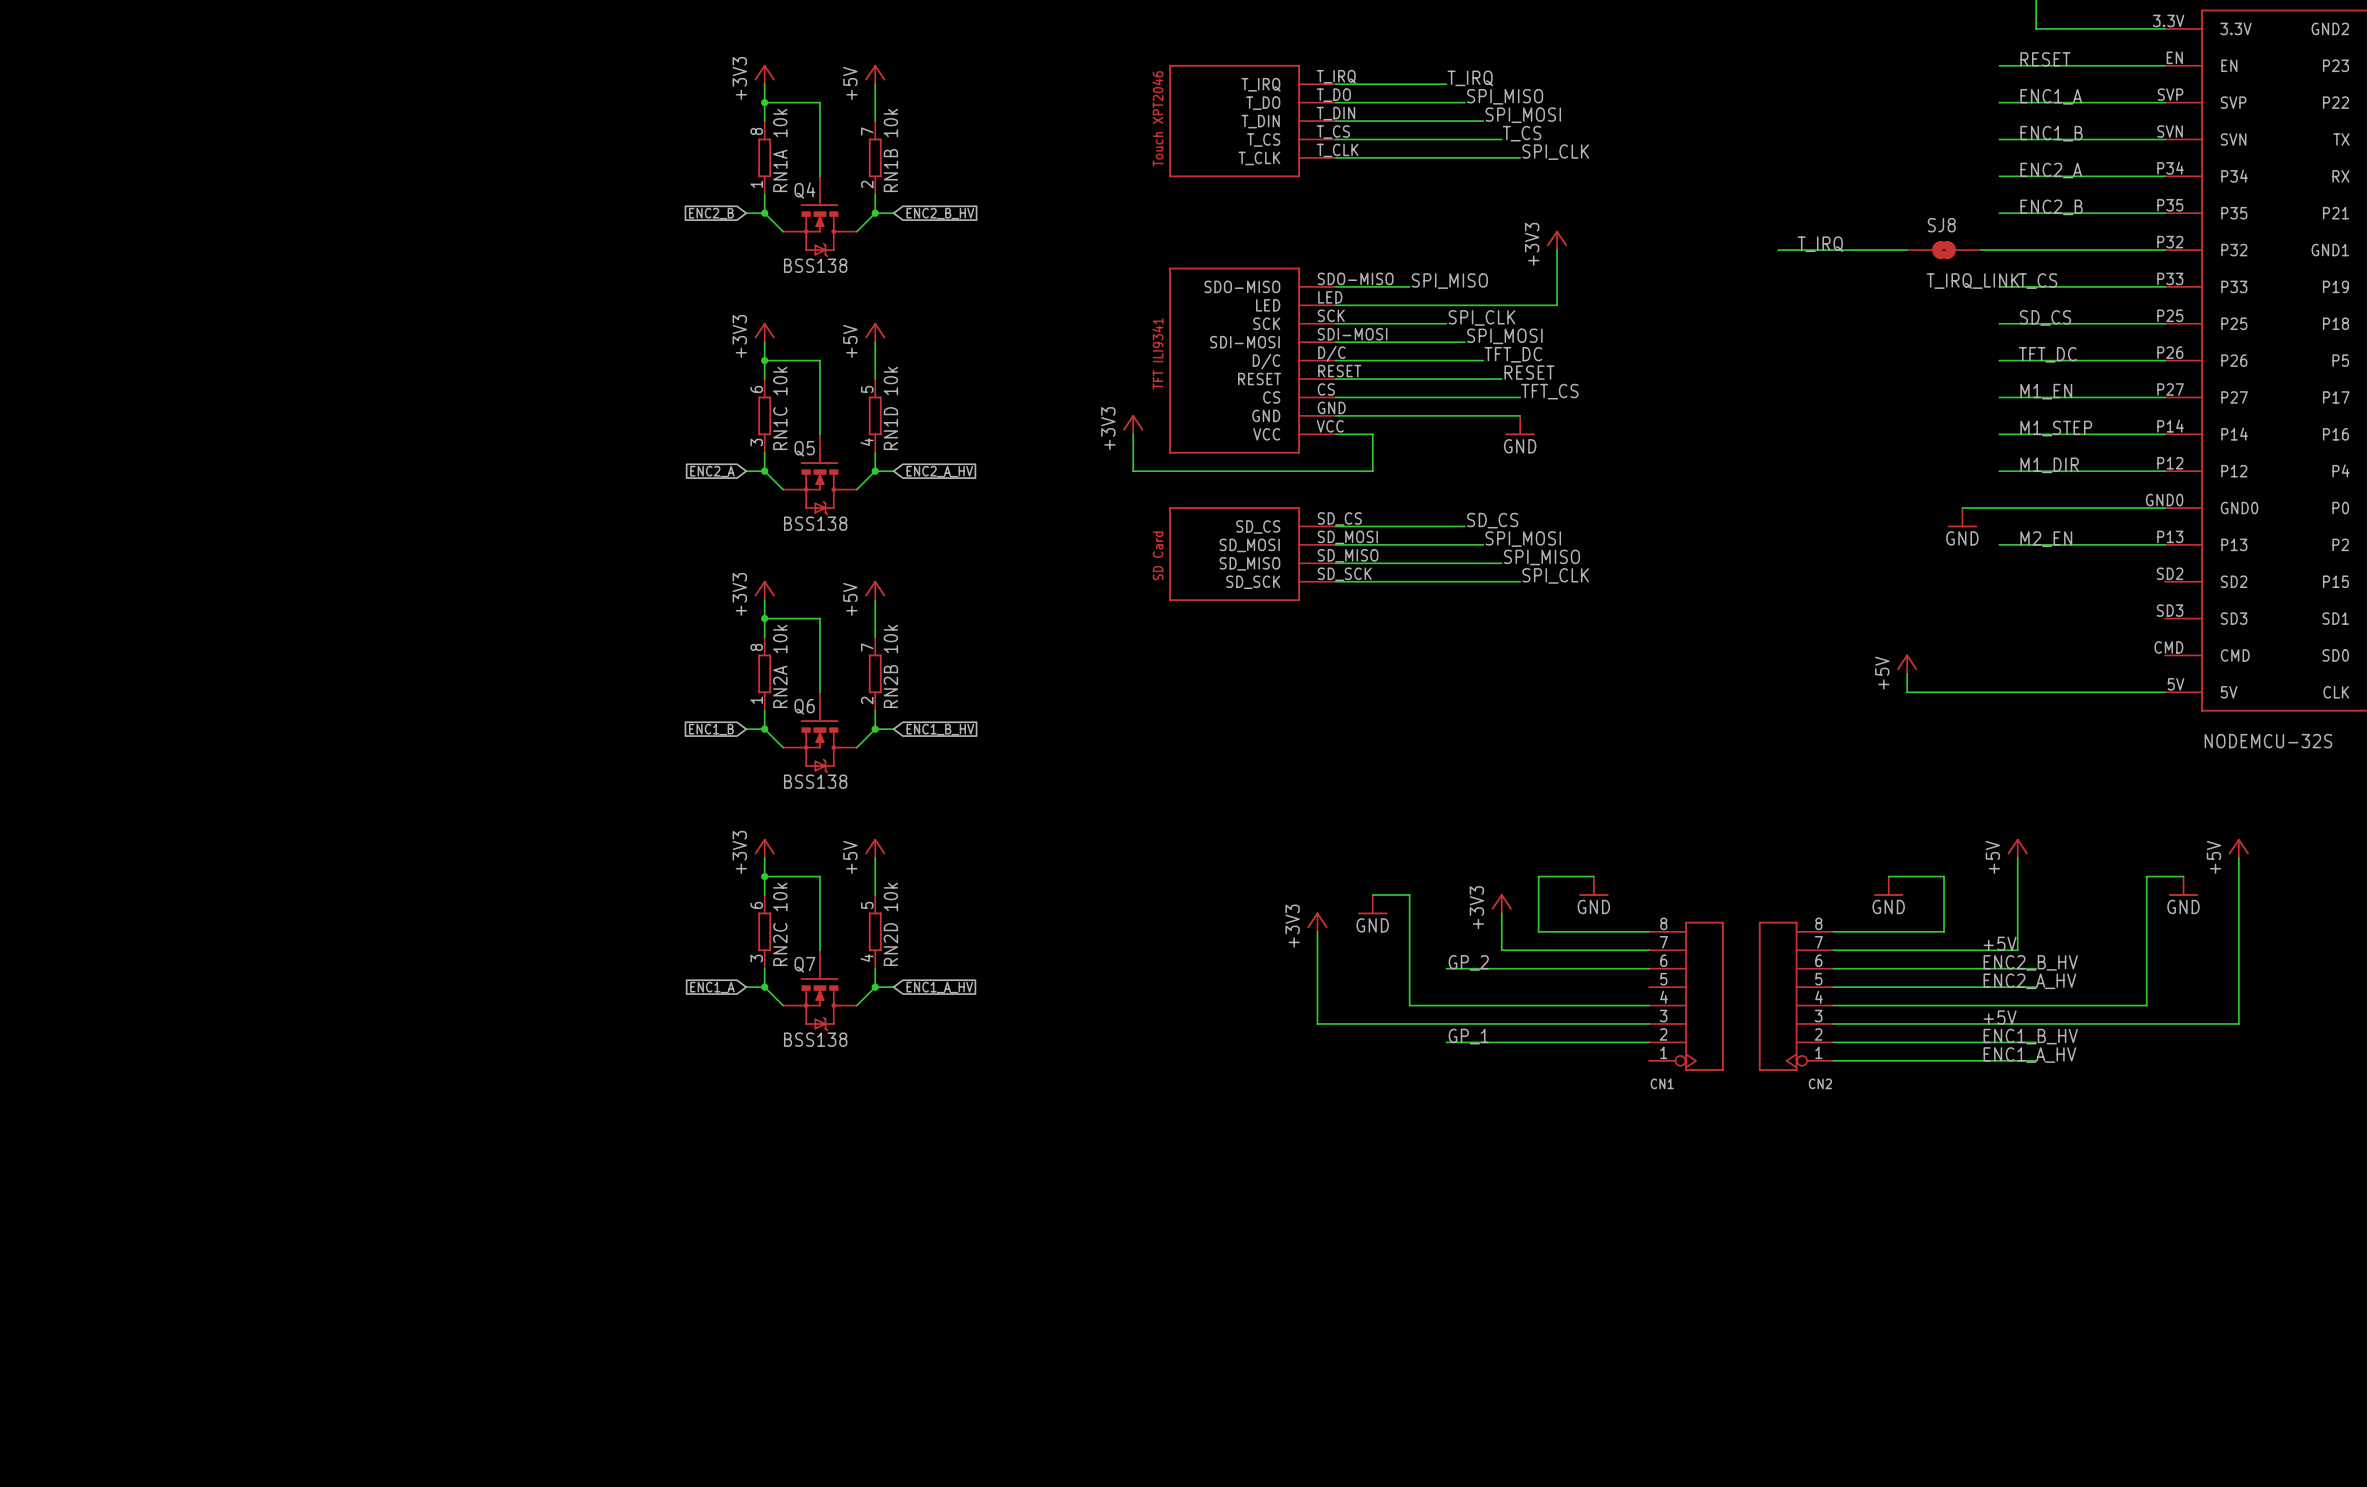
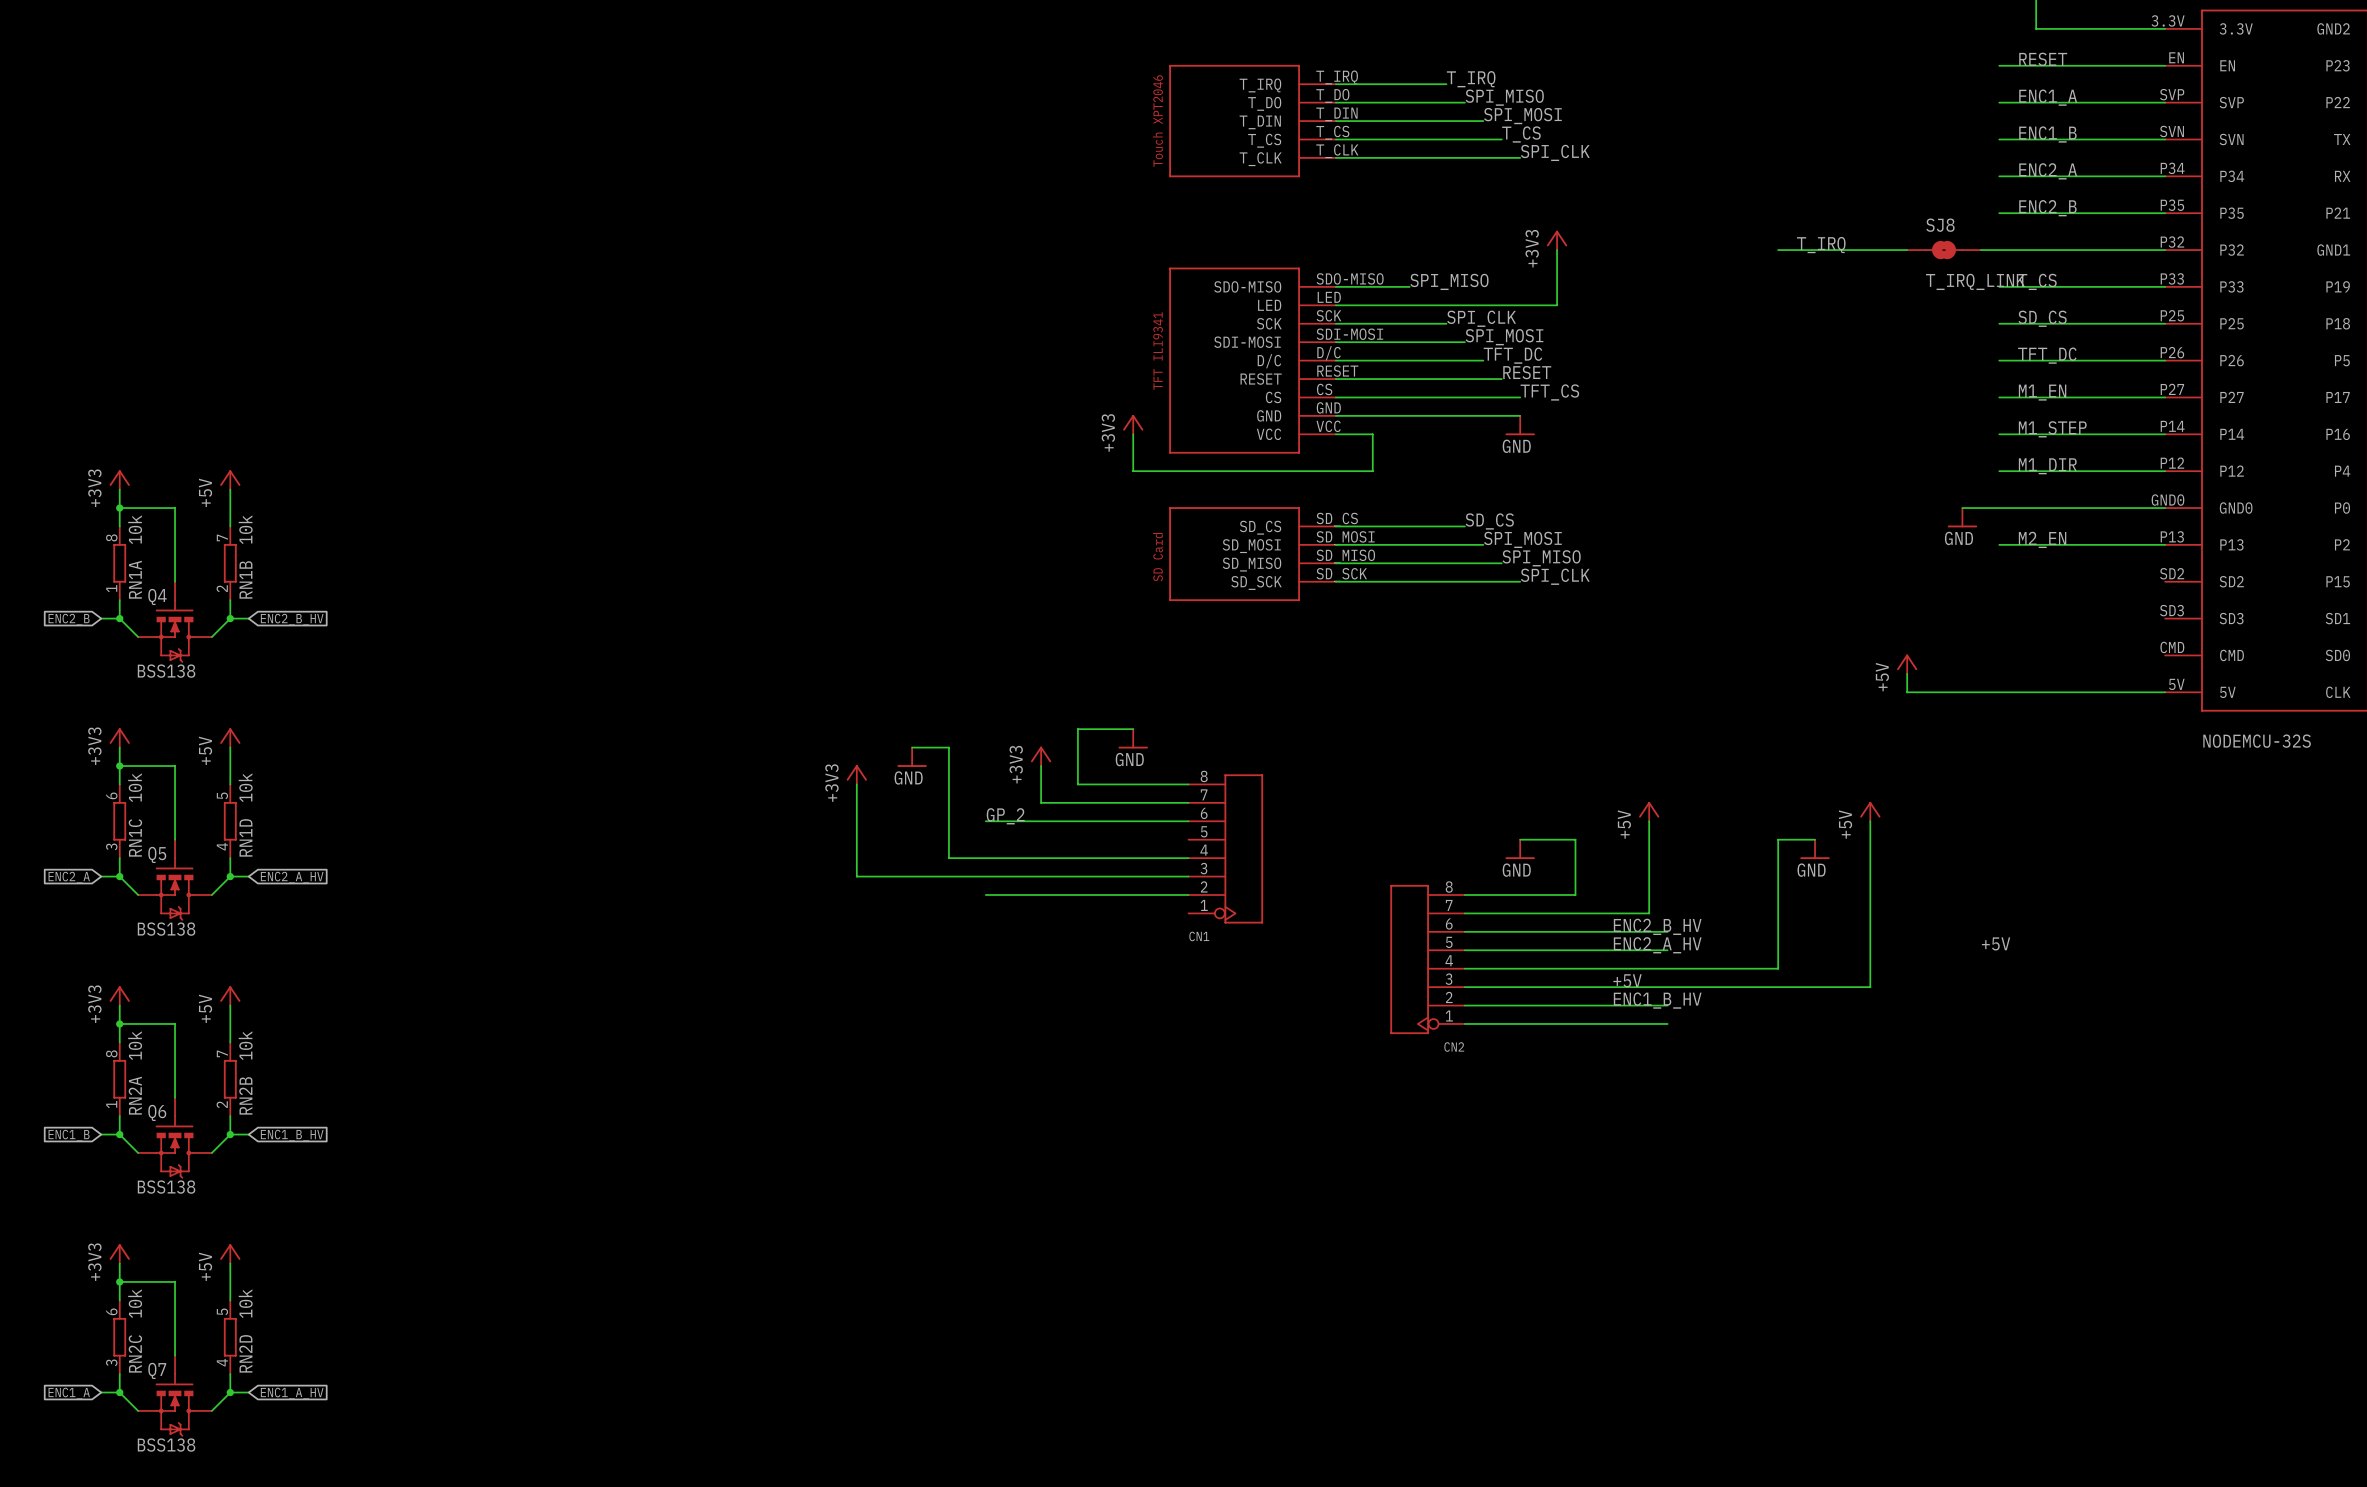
power symbol: +3V3 (764, 74) -> none
power symbol: +5V (875, 74) -> none
wire: (764, 84) (764, 121) -> none
wire: (875, 84) (875, 121) -> none
wire: (764, 102) (819, 102) (819, 176) -> none
junction: (764, 102) -> none
RN1A position: (764, 157) -> (119, 563)
RN1B position: (875, 157) -> (230, 563)
wire: (764, 194) (764, 213) -> none
wire: (875, 194) (875, 213) -> none
global label: ENC2_B (711, 213) -> none
wire: (746, 213) (764, 213) -> none
wire: (764, 213) (783, 231) -> none
junction: (764, 213) -> none
wire: (875, 213) (893, 213) -> none
wire: (875, 213) (856, 231) -> none
junction: (875, 213) -> none
global label: ENC2_B_HV (940, 213) -> none
Q4 position: (819, 216) -> (175, 622)
power symbol: +3V3 (764, 332) -> none
power symbol: +5V (875, 332) -> none
wire: (764, 342) (764, 379) -> none
wire: (875, 342) (875, 379) -> none
wire: (764, 360) (819, 360) (819, 434) -> none
junction: (764, 360) -> none
RN1C position: (764, 415) -> (119, 821)
RN1D position: (875, 415) -> (230, 821)
wire: (764, 452) (764, 471) -> none
wire: (875, 452) (875, 471) -> none
global label: ENC2_A (712, 471) -> none
wire: (746, 471) (764, 471) -> none
wire: (764, 471) (783, 489) -> none
junction: (764, 471) -> none
wire: (875, 471) (893, 471) -> none
wire: (875, 471) (856, 489) -> none
junction: (875, 471) -> none
global label: ENC2_A_HV (939, 471) -> none
Q5 position: (819, 474) -> (175, 880)
power symbol: none -> +3V3 (119, 479)
power symbol: none -> +5V (230, 479)
wire: none -> (119, 489) (119, 526)
wire: none -> (230, 489) (230, 526)
wire: none -> (119, 508) (175, 508) (175, 581)
junction: none -> (119, 508)
power symbol: +3V3 (764, 590) -> none
power symbol: +5V (875, 590) -> none
wire: none -> (119, 600) (119, 618)
wire: none -> (230, 600) (230, 618)
wire: (764, 600) (764, 637) -> none
wire: (875, 600) (875, 637) -> none
wire: none -> (101, 618) (119, 618)
wire: none -> (119, 618) (138, 637)
junction: none -> (119, 618)
wire: none -> (230, 618) (248, 618)
wire: none -> (230, 618) (211, 637)
junction: none -> (230, 618)
wire: (764, 618) (819, 618) (819, 692) -> none
junction: (764, 618) -> none
global label: none -> ENC2_B (69, 619)
global label: none -> ENC2_B_HV (292, 619)
RN2A position: (764, 673) -> (119, 1079)
RN2B position: (875, 673) -> (230, 1079)
wire: (764, 710) (764, 729) -> none
wire: (875, 710) (875, 729) -> none
global label: ENC1_B (711, 729) -> none
wire: (746, 729) (764, 729) -> none
wire: (764, 729) (783, 747) -> none
junction: (764, 729) -> none
wire: (875, 729) (893, 729) -> none
wire: (875, 729) (856, 747) -> none
junction: (875, 729) -> none
global label: ENC1_B_HV (940, 729) -> none
wire: none -> (1133, 729) (1077, 729) (1077, 784) (1188, 784)
Q6 position: (819, 732) -> (175, 1138)
power symbol: none -> +3V3 (119, 737)
power symbol: none -> +5V (230, 737)
power symbol: none -> GND (1133, 738)
wire: none -> (119, 747) (119, 784)
wire: none -> (230, 747) (230, 784)
wire: none -> (912, 747) (948, 747) (948, 858) (1188, 858)
power symbol: none -> +3V3 (1041, 756)
power symbol: none -> GND (912, 757)
wire: none -> (119, 766) (175, 766) (175, 839)
junction: none -> (119, 766)
wire: none -> (1041, 766) (1041, 802) (1188, 802)
power symbol: none -> +3V3 (856, 774)
wire: none -> (856, 784) (856, 876) (1188, 876)
power symbol: none -> +5V (1649, 811)
label: none -> GP_2 (1005, 816)
wire: none -> (985, 821) (1188, 821)
wire: none -> (1649, 821) (1649, 913) (1464, 913)
wire: none -> (1520, 839) (1575, 839) (1575, 895) (1464, 895)
wire: none -> (1815, 839) (1778, 839) (1778, 968) (1649, 968)
power symbol: +3V3 (764, 848) -> none
power symbol: +5V (875, 848) -> none
power symbol position: +5V (2017, 848) -> +5V (1870, 811)
power symbol: +5V (2238, 848) -> none
power symbol: none -> GND (1520, 849)
wire: none -> (119, 858) (119, 876)
wire: none -> (230, 858) (230, 876)
wire: (764, 858) (764, 895) -> none
wire: (875, 858) (875, 895) -> none
wire: (2017, 858) (2017, 950) (1833, 950) -> none
wire: (2238, 858) (2238, 1023) (1833, 1023) -> none
wire: none -> (101, 876) (119, 876)
wire: none -> (119, 876) (138, 895)
junction: none -> (119, 876)
wire: none -> (230, 876) (248, 876)
wire: none -> (230, 876) (211, 895)
junction: none -> (230, 876)
wire: (764, 876) (819, 876) (819, 950) -> none
junction: (764, 876) -> none
wire: (1593, 876) (1538, 876) (1538, 931) -> (1464, 931) (1538, 931)
wire: (1888, 876) (1944, 876) (1944, 931) (1833, 931) -> none
wire: (2183, 876) (2146, 876) (2146, 1005) (1833, 1005) -> none
global label: none -> ENC2_A (69, 877)
global label: none -> ENC2_A_HV (292, 877)
power symbol: GND (1593, 886) -> none
power symbol position: GND (1888, 886) -> GND (1815, 849)
power symbol: GND (2183, 886) -> none
wire: none -> (985, 895) (1188, 895)
wire: (1372, 895) (1409, 895) (1409, 1005) (1464, 1005) -> none
power symbol: +3V3 (1501, 903) -> none
power symbol: GND (1372, 904) -> none
wire: (1501, 913) (1501, 950) -> (1464, 950) (1501, 950)
power symbol: +3V3 (1317, 922) -> none
label: none -> ENC2_B_HV (1657, 926)
RN2C position: (764, 931) -> (119, 1337)
RN2D position: (875, 931) -> (230, 1337)
wire: (1317, 931) (1317, 1023) (1464, 1023) -> none
label: none -> ENC2_A_HV (1657, 945)
label: GP_2 (1468, 962) -> none
label: ENC2_B_HV (2030, 962) -> none
wire: (764, 968) (764, 987) -> none
wire: (875, 968) (875, 987) -> none
wire: (1833, 968) (2036, 968) -> none
label: none -> +5V (1627, 980)
label: ENC2_A_HV (2029, 981) -> none
global label: ENC1_A (712, 987) -> none
wire: (746, 987) (764, 987) -> none
wire: (764, 987) (783, 1005) -> none
junction: (764, 987) -> none
wire: (875, 987) (893, 987) -> none
wire: (875, 987) (856, 1005) -> none
junction: (875, 987) -> none
global label: ENC1_A_HV (939, 987) -> none
wire: none -> (1464, 987) (1833, 987)
wire: (1870, 987) (2036, 987) -> (1870, 987) (1870, 821)
Q7 position: (819, 990) -> (175, 1396)
power symbol: none -> +3V3 (119, 995)
power symbol: none -> +5V (230, 995)
CN1 position: (1686, 996) -> (1225, 848)
CN2 position: (1796, 996) -> (1427, 959)
label: none -> ENC1_B_HV (1657, 1000)
wire: none -> (119, 1005) (119, 1042)
wire: none -> (230, 1005) (230, 1042)
label: +5V (2000, 1017) -> none
wire: none -> (119, 1023) (175, 1023) (175, 1097)
junction: none -> (119, 1023)
label: GP_1 (1468, 1036) -> none
label: ENC1_B_HV (2030, 1036) -> none
wire: (1446, 1042) (1649, 1042) -> none
wire: (1833, 1042) (2036, 1042) -> none
label: ENC1_A_HV (2029, 1055) -> none
wire: (1833, 1060) (2036, 1060) -> none
wire: none -> (119, 1116) (119, 1134)
wire: none -> (230, 1116) (230, 1134)
global label: none -> ENC1_B (69, 1135)
wire: none -> (101, 1134) (119, 1134)
wire: none -> (119, 1134) (138, 1152)
junction: none -> (119, 1134)
wire: none -> (230, 1134) (248, 1134)
wire: none -> (230, 1134) (211, 1152)
junction: none -> (230, 1134)
global label: none -> ENC1_B_HV (292, 1135)
power symbol: none -> +3V3 (119, 1253)
power symbol: none -> +5V (230, 1253)
wire: none -> (119, 1263) (119, 1300)
wire: none -> (230, 1263) (230, 1300)
wire: none -> (119, 1281) (175, 1281) (175, 1355)
junction: none -> (119, 1281)
wire: none -> (119, 1374) (119, 1392)
wire: none -> (230, 1374) (230, 1392)
global label: none -> ENC1_A (69, 1393)
wire: none -> (101, 1392) (119, 1392)
wire: none -> (119, 1392) (138, 1410)
junction: none -> (119, 1392)
wire: none -> (230, 1392) (248, 1392)
wire: none -> (230, 1392) (211, 1410)
junction: none -> (230, 1392)
global label: none -> ENC1_A_HV (292, 1393)

